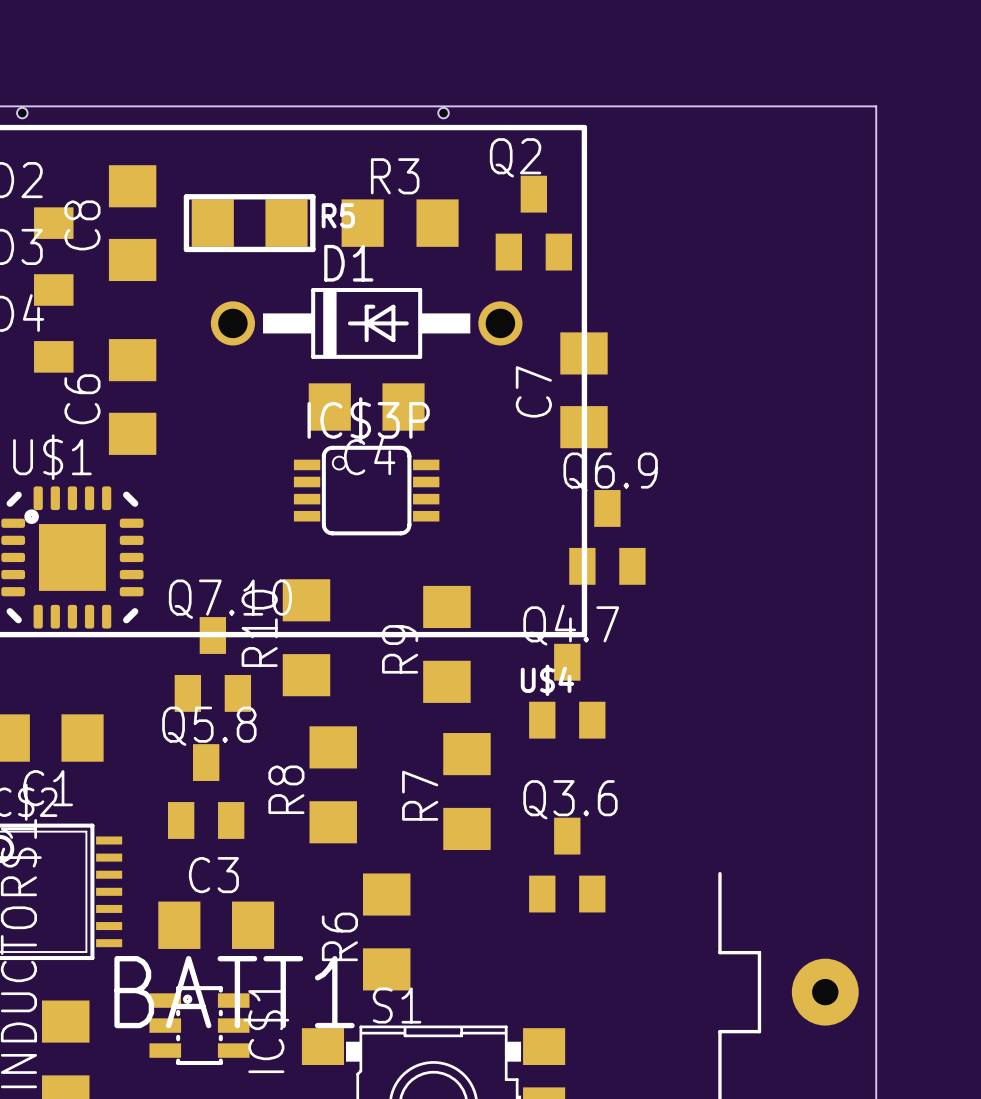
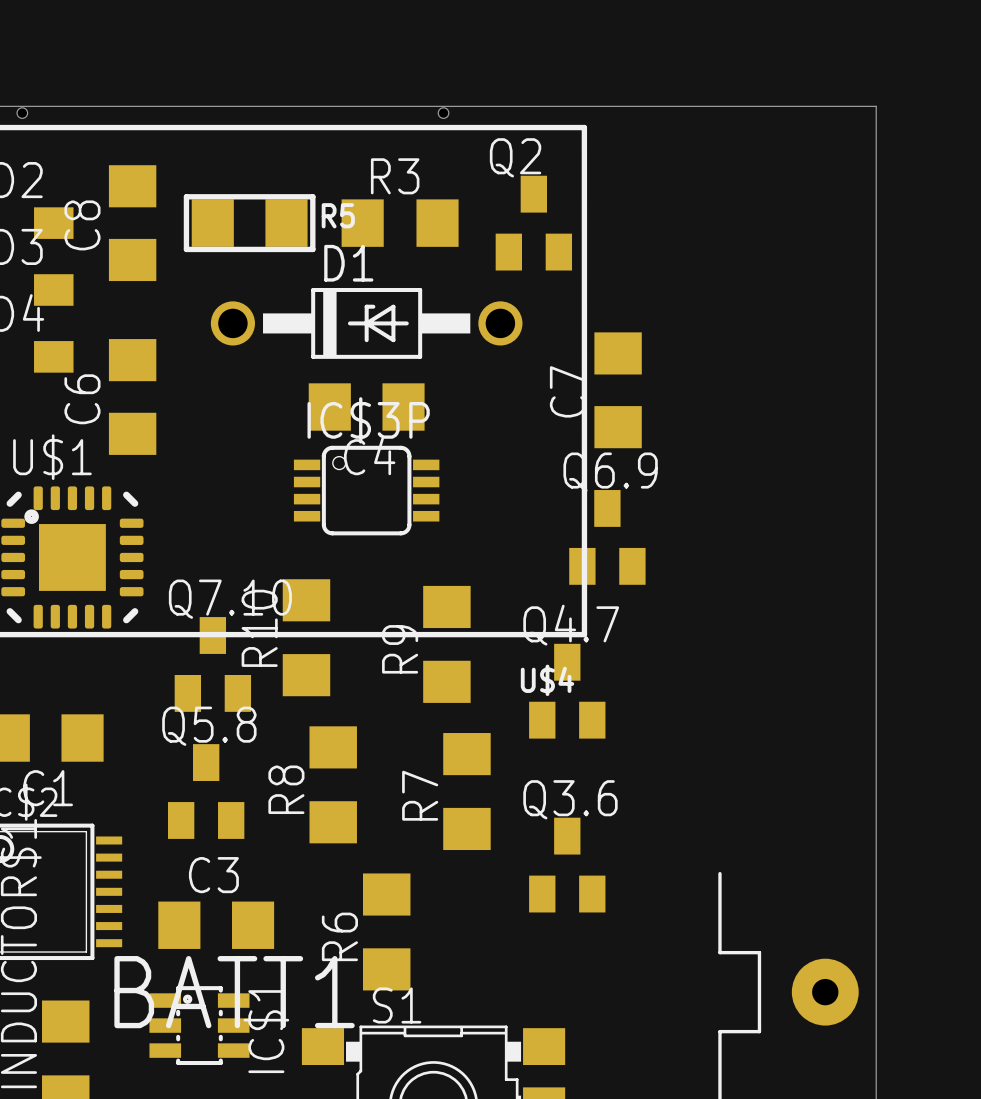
C7 position: (583, 390) -> (618, 390)

